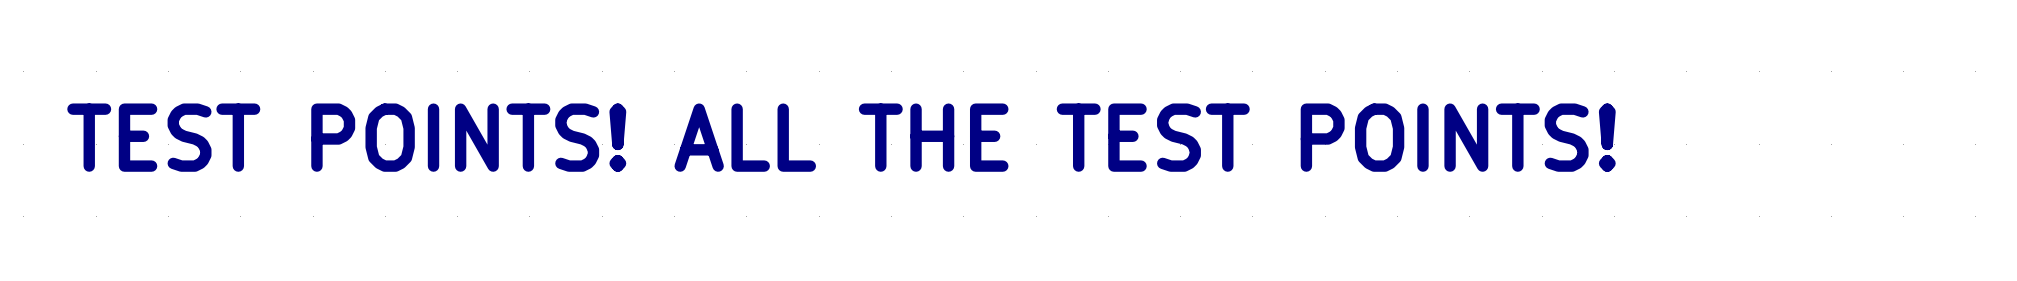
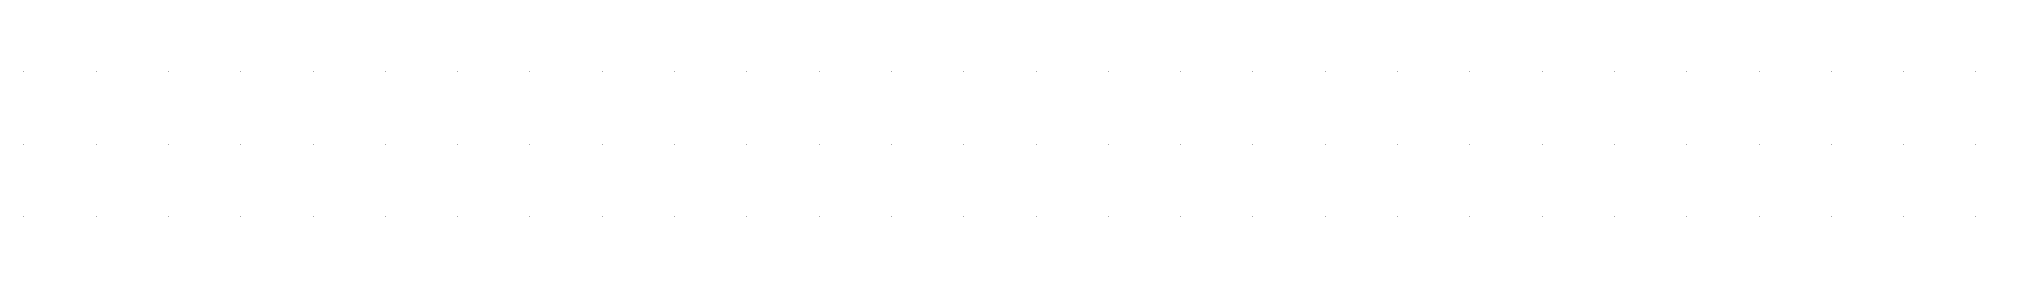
text: TEST POINTS! ALL THE TEST POINTS! (841, 137) -> none

